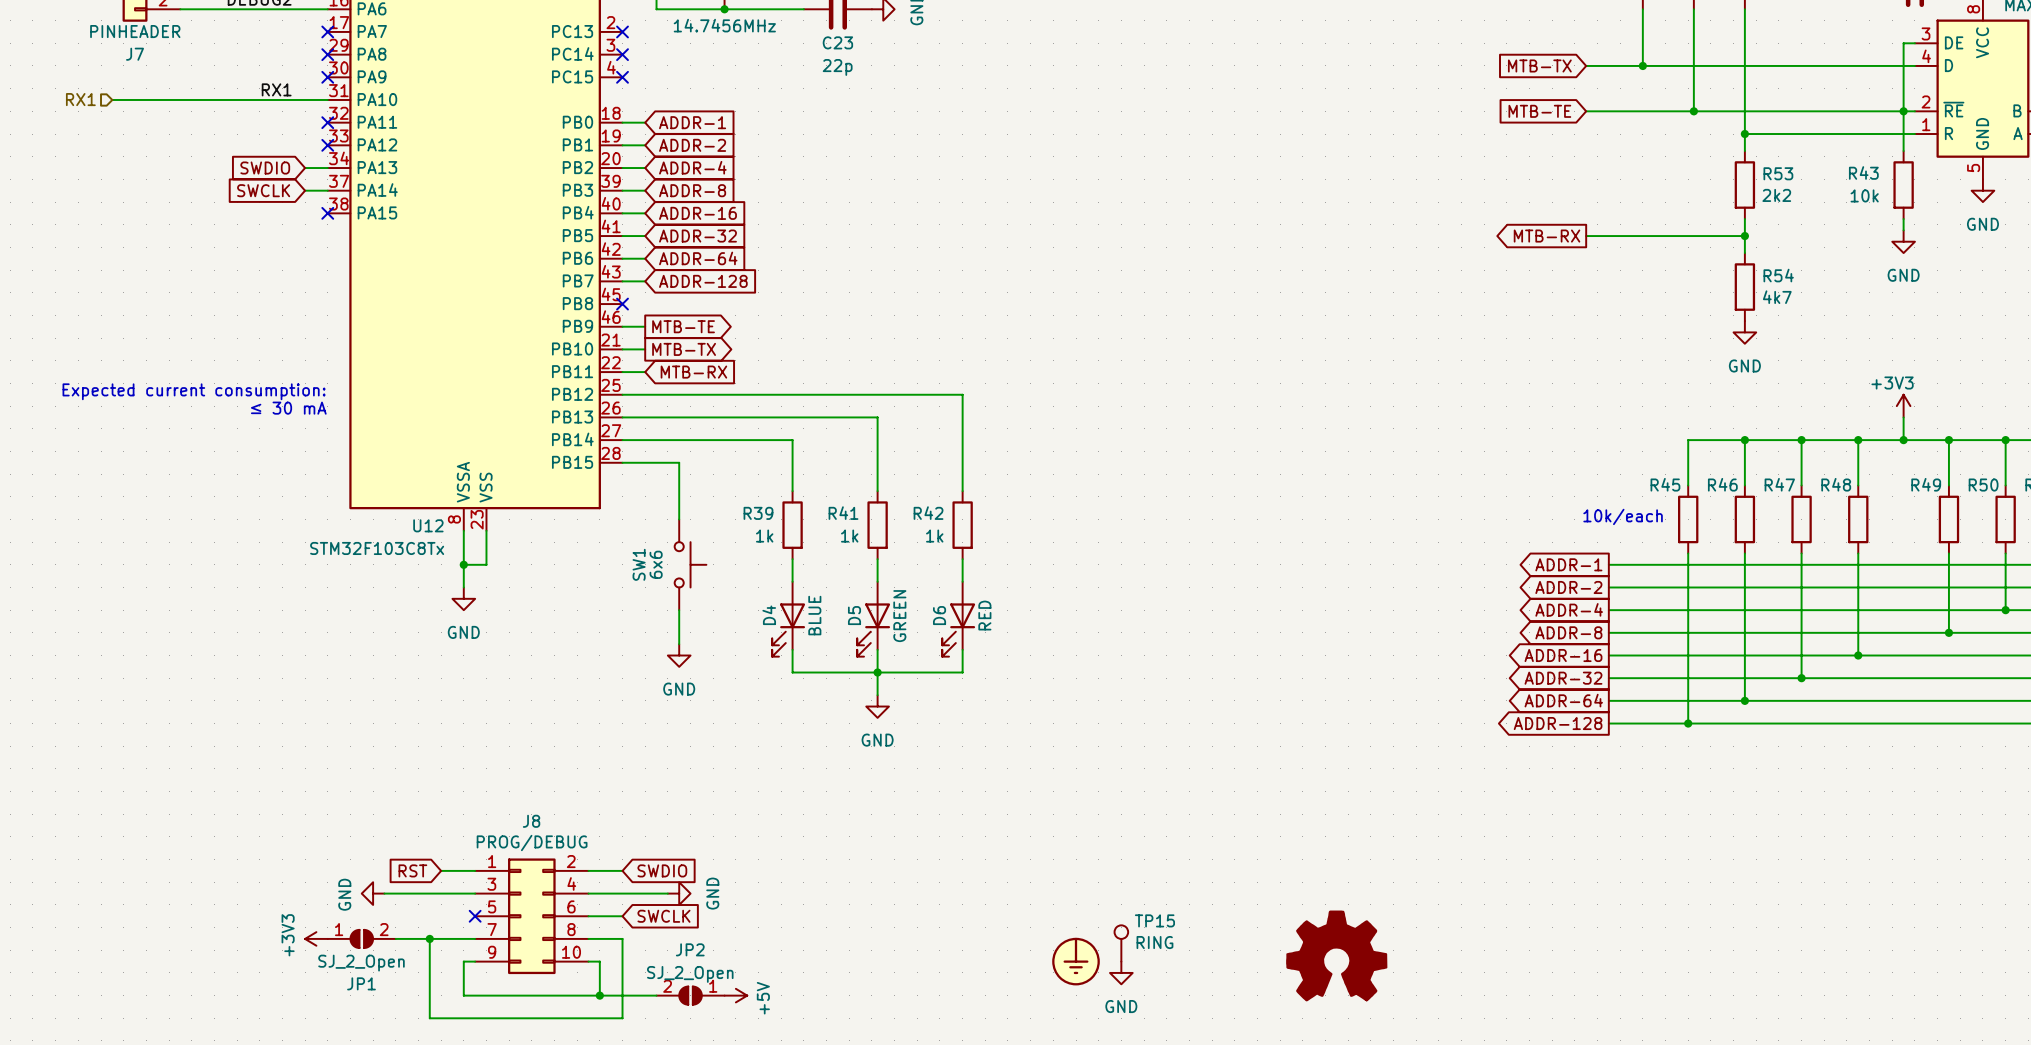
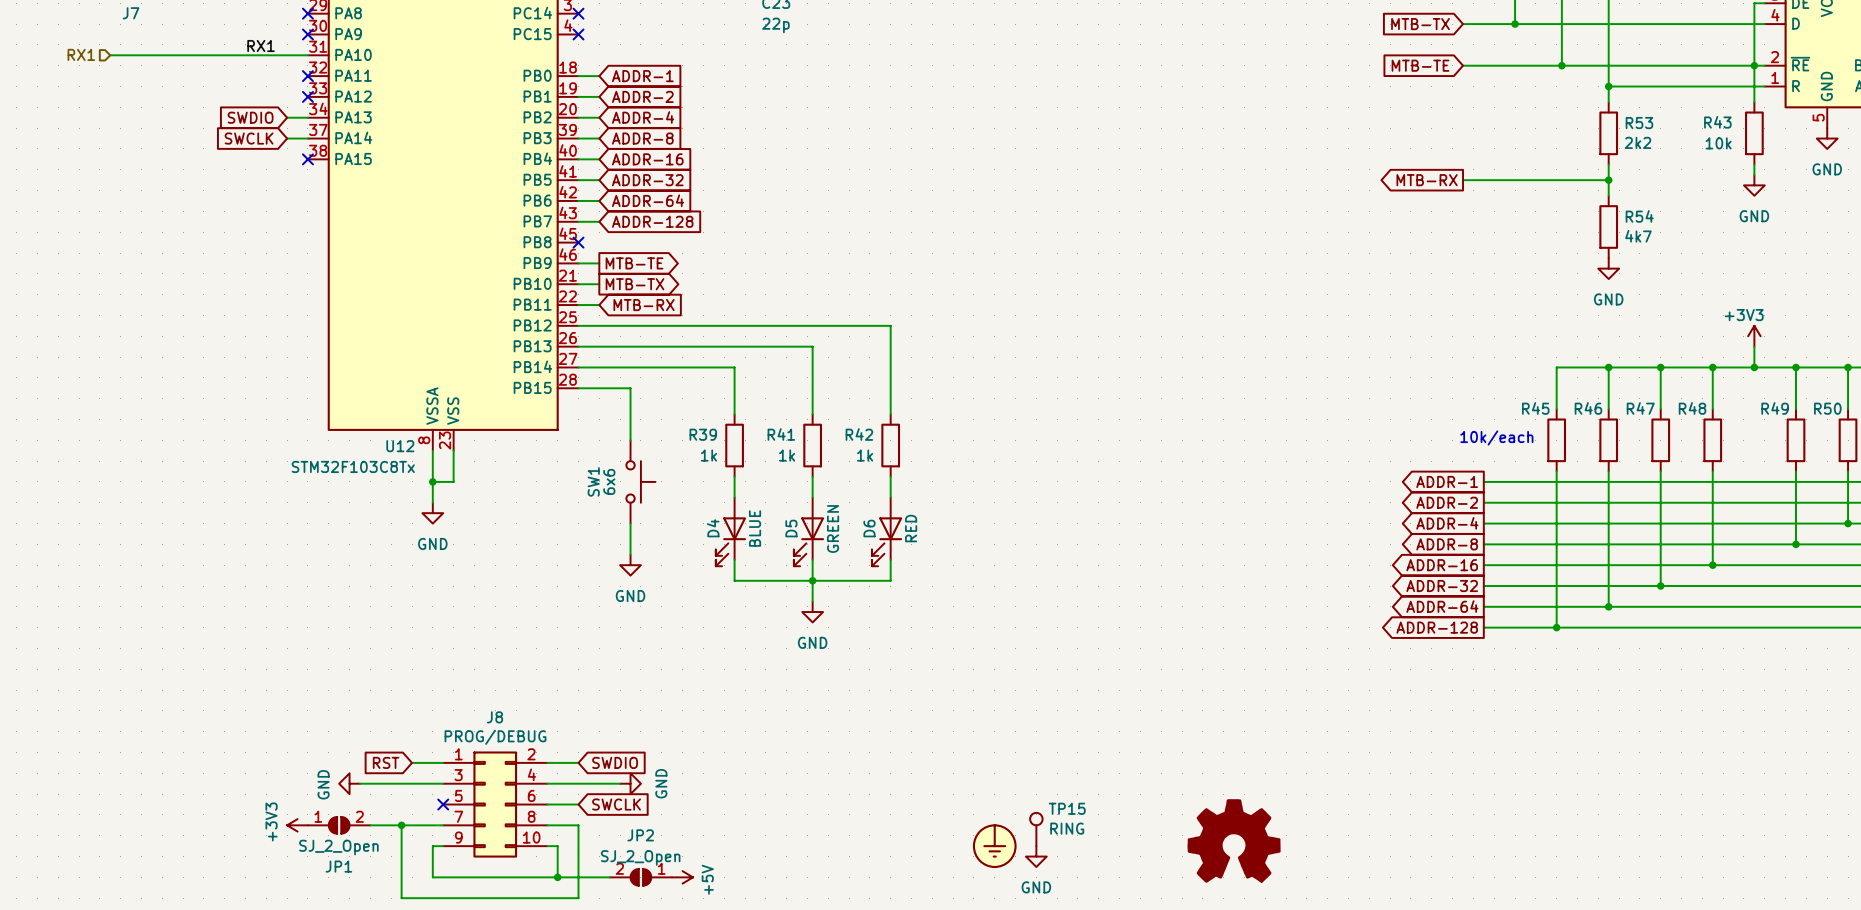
text: Expected current consumption: (194, 391) -> none
text: ≤ 30 mA (288, 408) -> none

